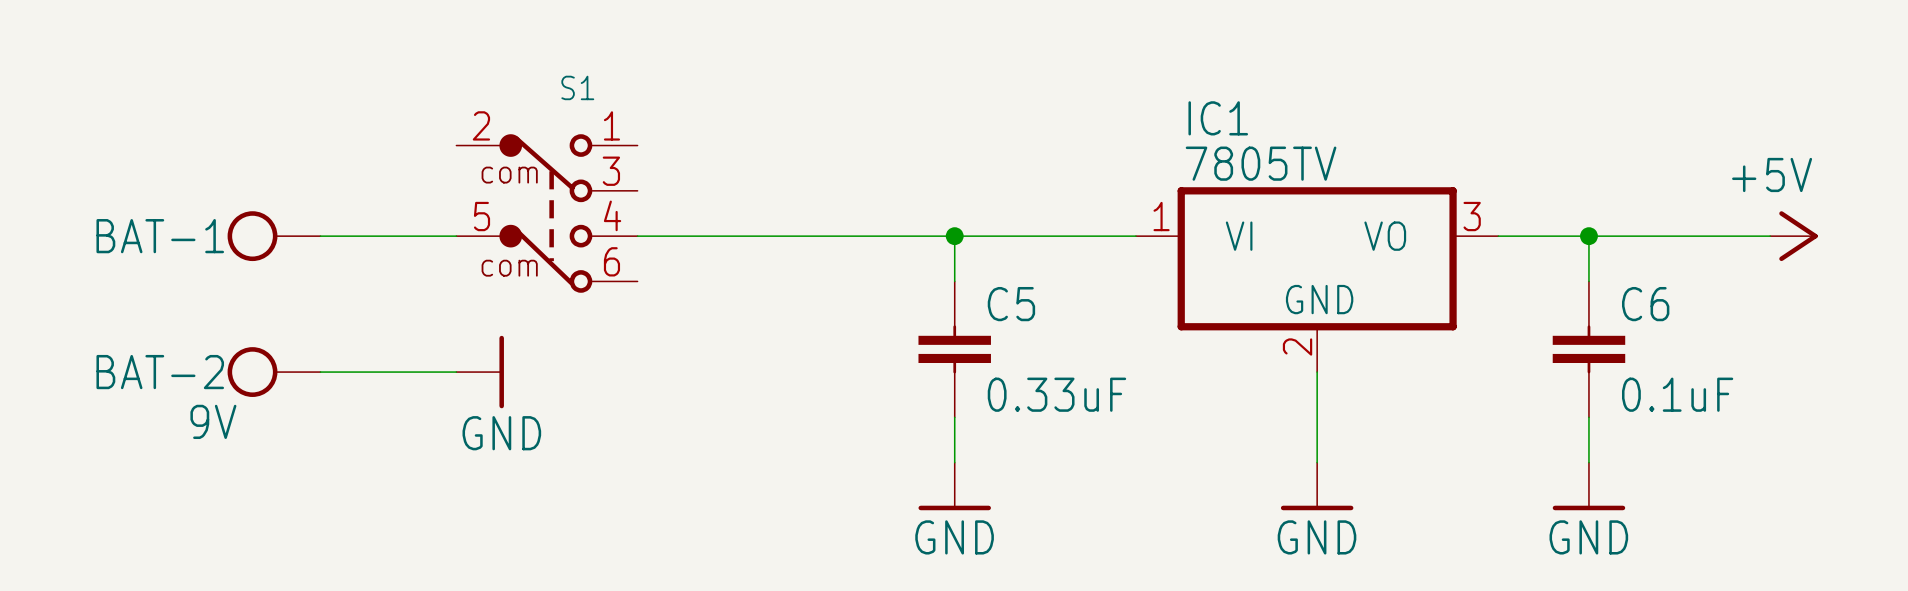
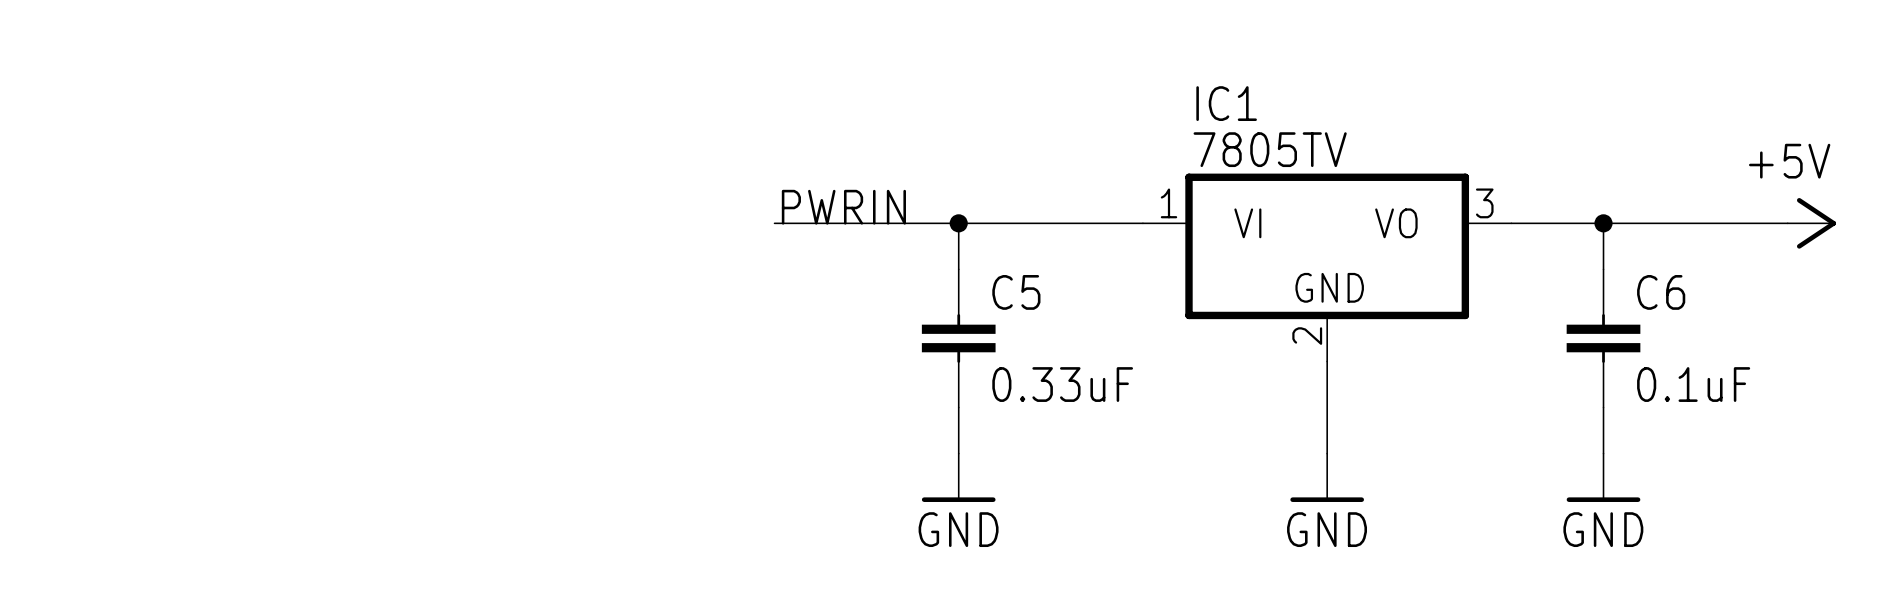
S1: (546, 213) -> none
label: none -> PWRIN (843, 207)
BAT-1: (274, 236) -> none
wire: (320, 236) (456, 236) -> none
wire: (637, 236) (773, 236) -> none
BAT-2: 9V (274, 372) -> none
wire: (320, 372) (456, 372) -> none
power symbol: GND (480, 372) -> none

